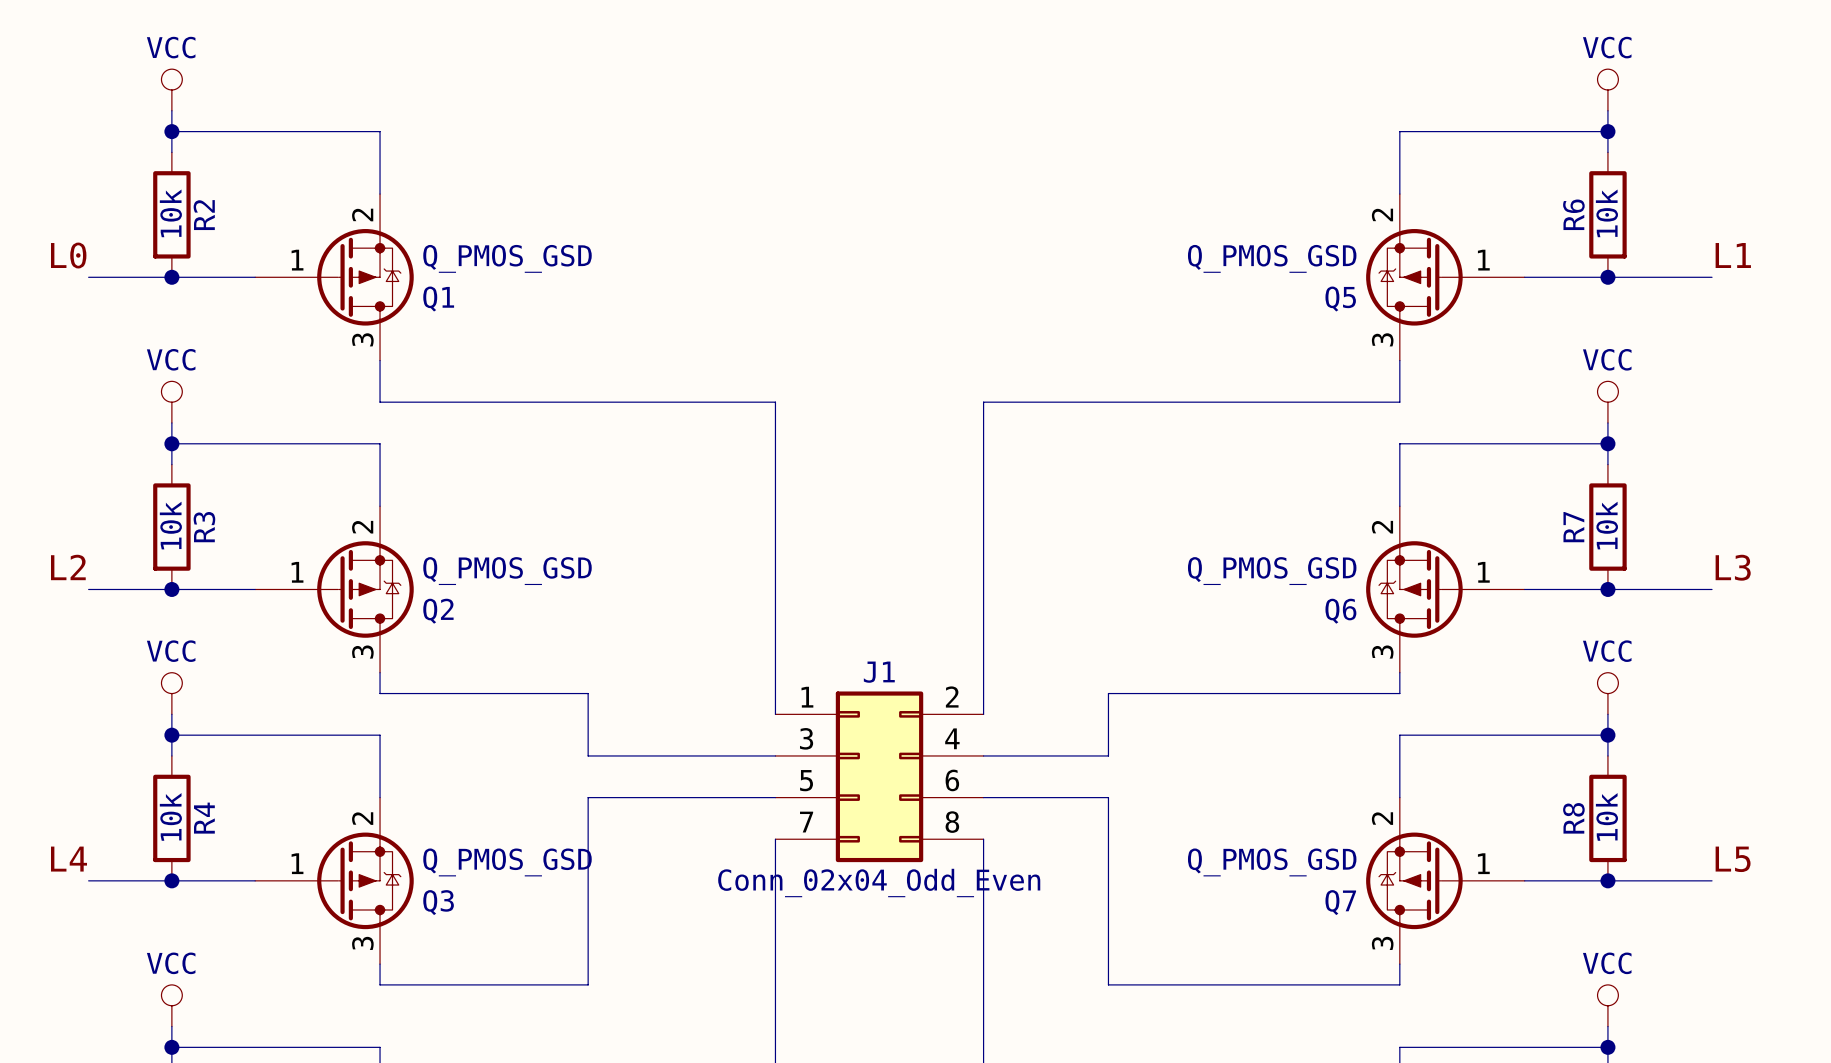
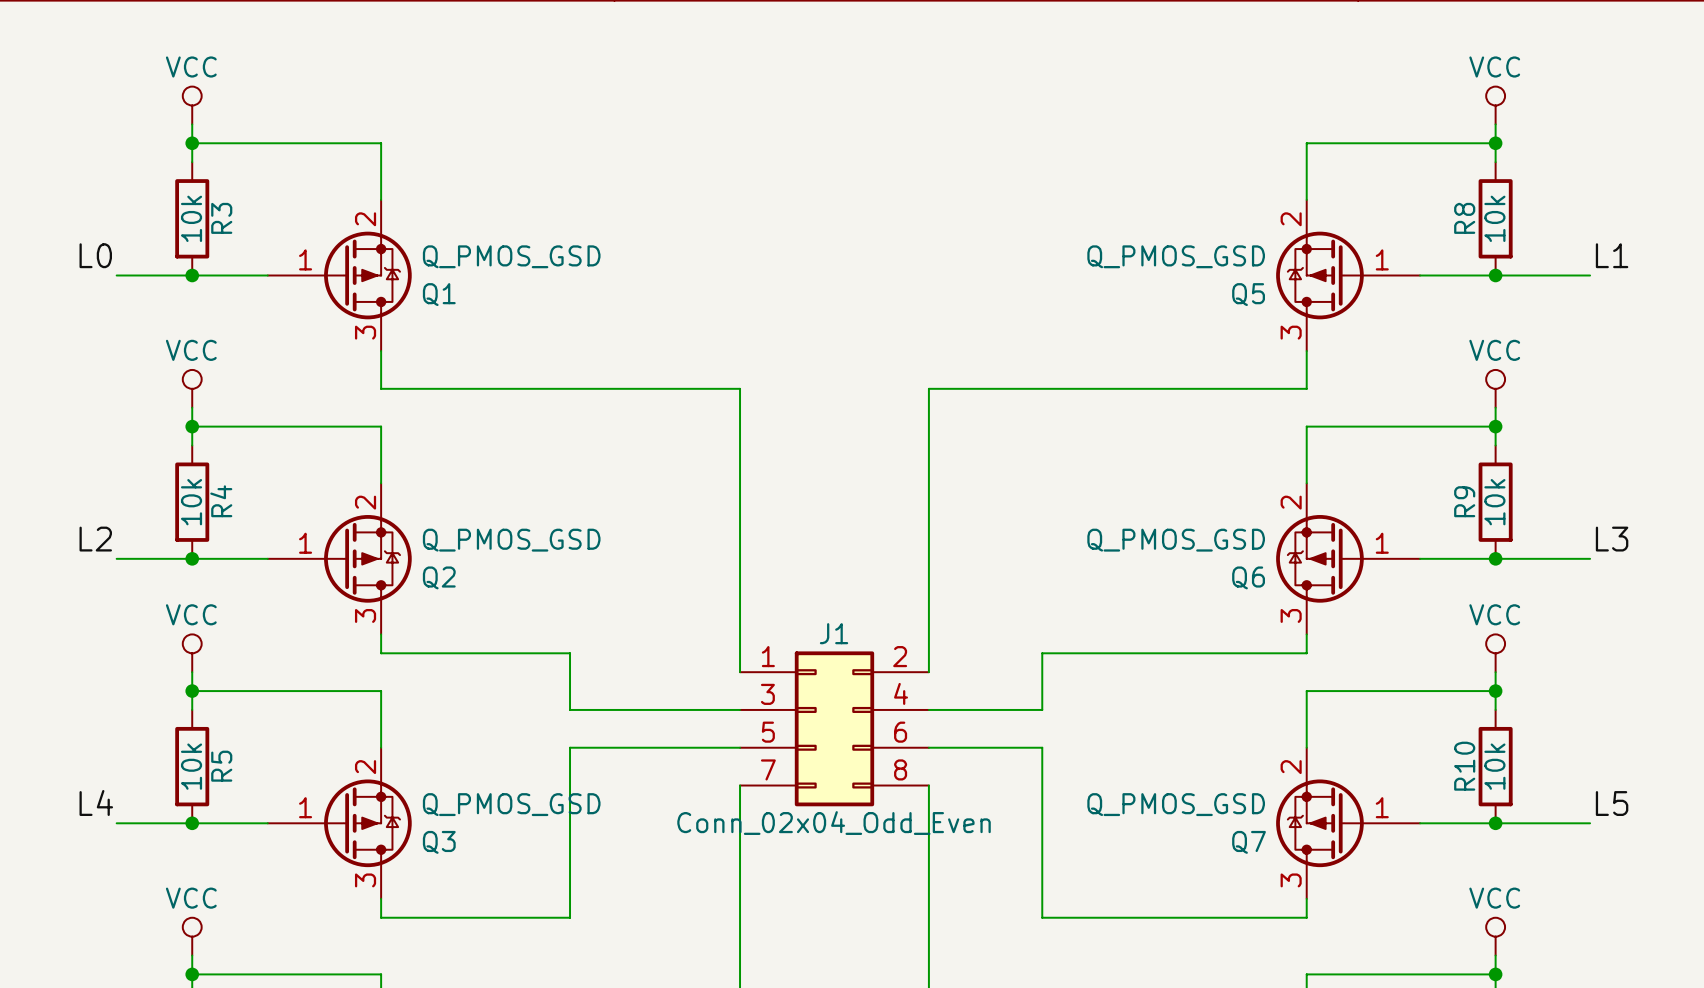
R6 name: R6 (1573, 214) -> R8 (1464, 218)
R2 name: R2 (204, 215) -> R3 (221, 218)
R3 name: R3 (204, 527) -> R4 (221, 501)
R7 name: R7 (1573, 527) -> R9 (1464, 501)
R4 name: R4 (204, 818) -> R5 (221, 766)
R8 name: R8 (1573, 818) -> R10 (1464, 766)

